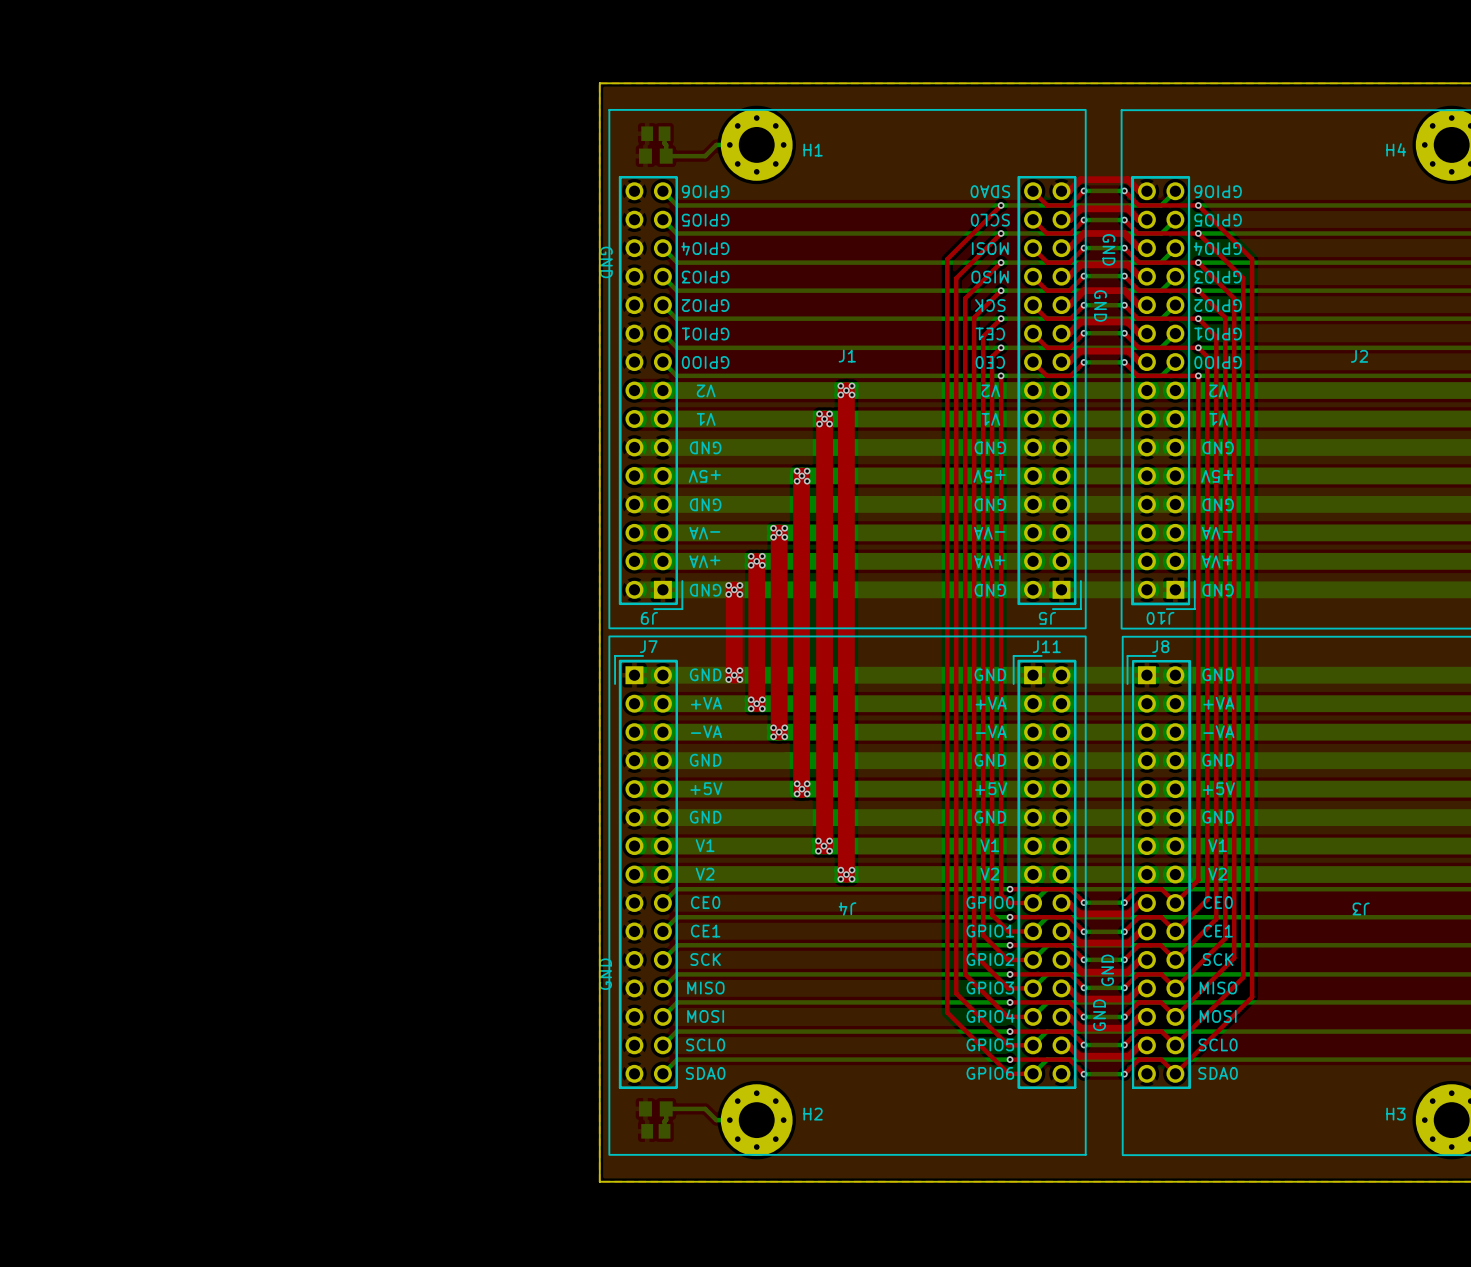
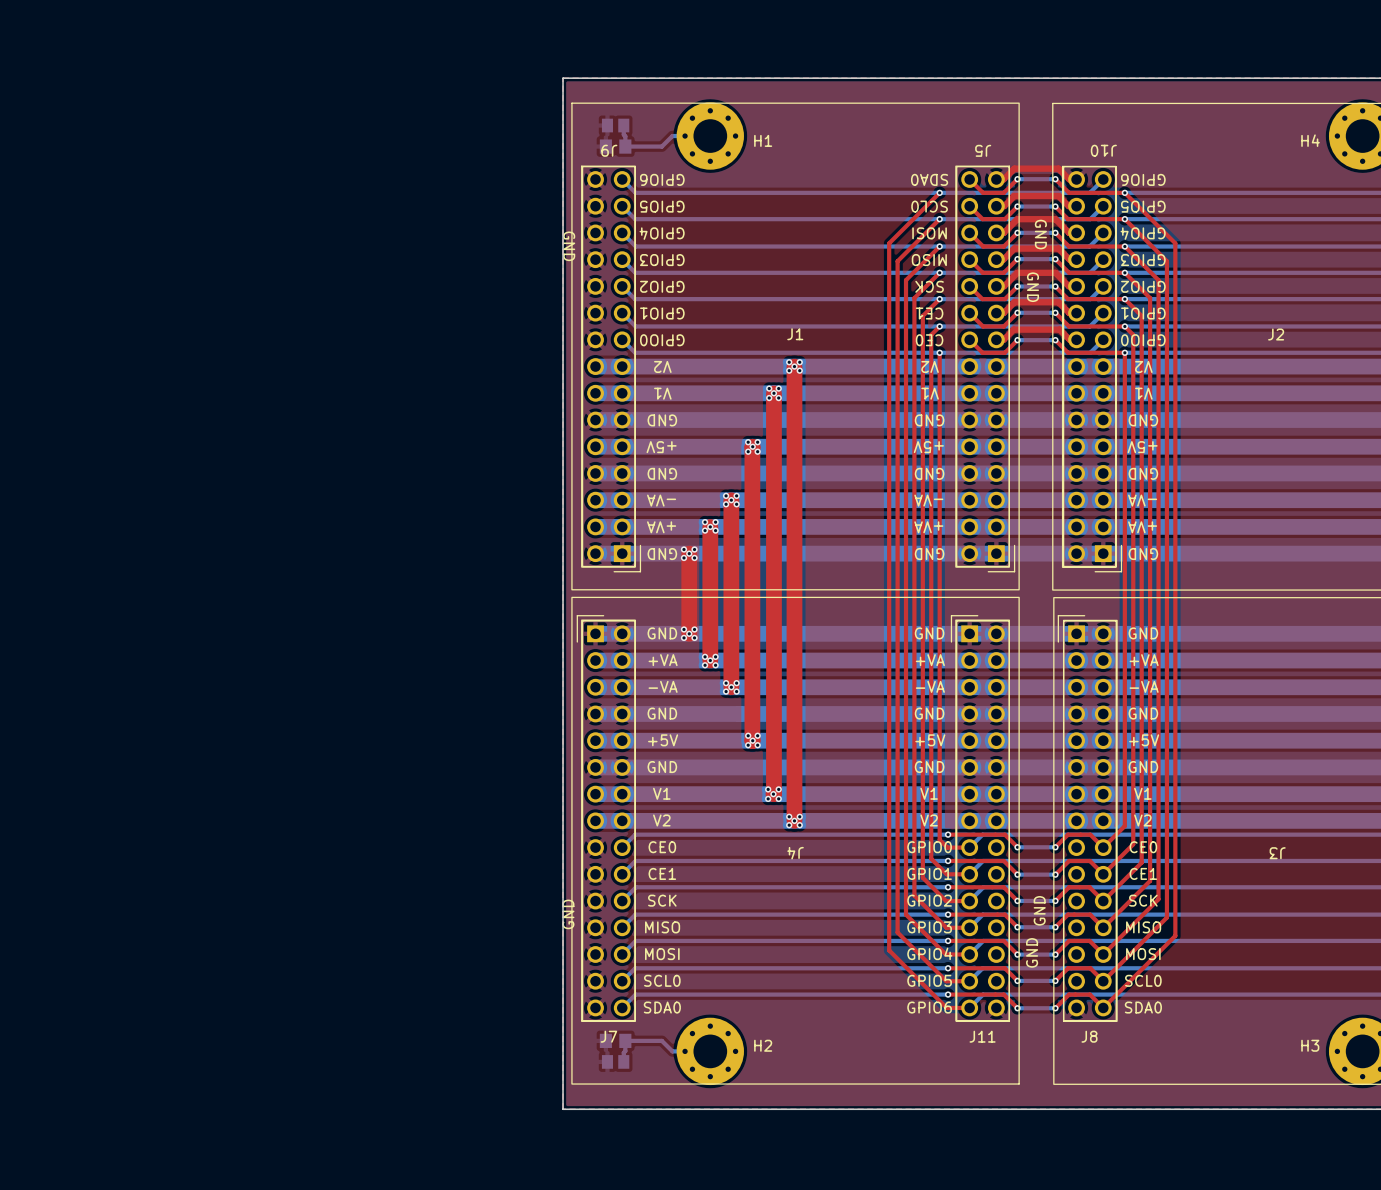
J9 name position: J9 (649, 618) -> J9 (609, 150)
J5 name position: J5 (1047, 618) -> J5 (983, 150)
J10 name position: J10 (1160, 618) -> J10 (1103, 150)
J7 name position: J7 (648, 646) -> J7 (608, 1036)
J11 name position: J11 (1046, 646) -> J11 (982, 1036)
J8 name position: J8 (1160, 646) -> J8 (1089, 1036)
top track: (1061, 903) (1068, 903) (1079, 913) (1128, 913) (1139, 903) (1146, 903) -> none
top track: (1061, 931) (1068, 931) (1079, 943) (1128, 943) (1140, 931) (1146, 931) -> none
top track: (1061, 959) (1069, 959) (1081, 972) (1127, 972) (1139, 959) (1146, 959) -> none
top track: (1061, 988) (1068, 988) (1079, 999) (1128, 999) (1139, 988) (1146, 988) -> none
top track: (1061, 1016) (1069, 1016) (1080, 1028) (1127, 1028) (1139, 1016) (1146, 1016) -> none
top track: (1061, 1045) (1068, 1045) (1079, 1056) (1128, 1056) (1139, 1045) (1146, 1045) -> none

